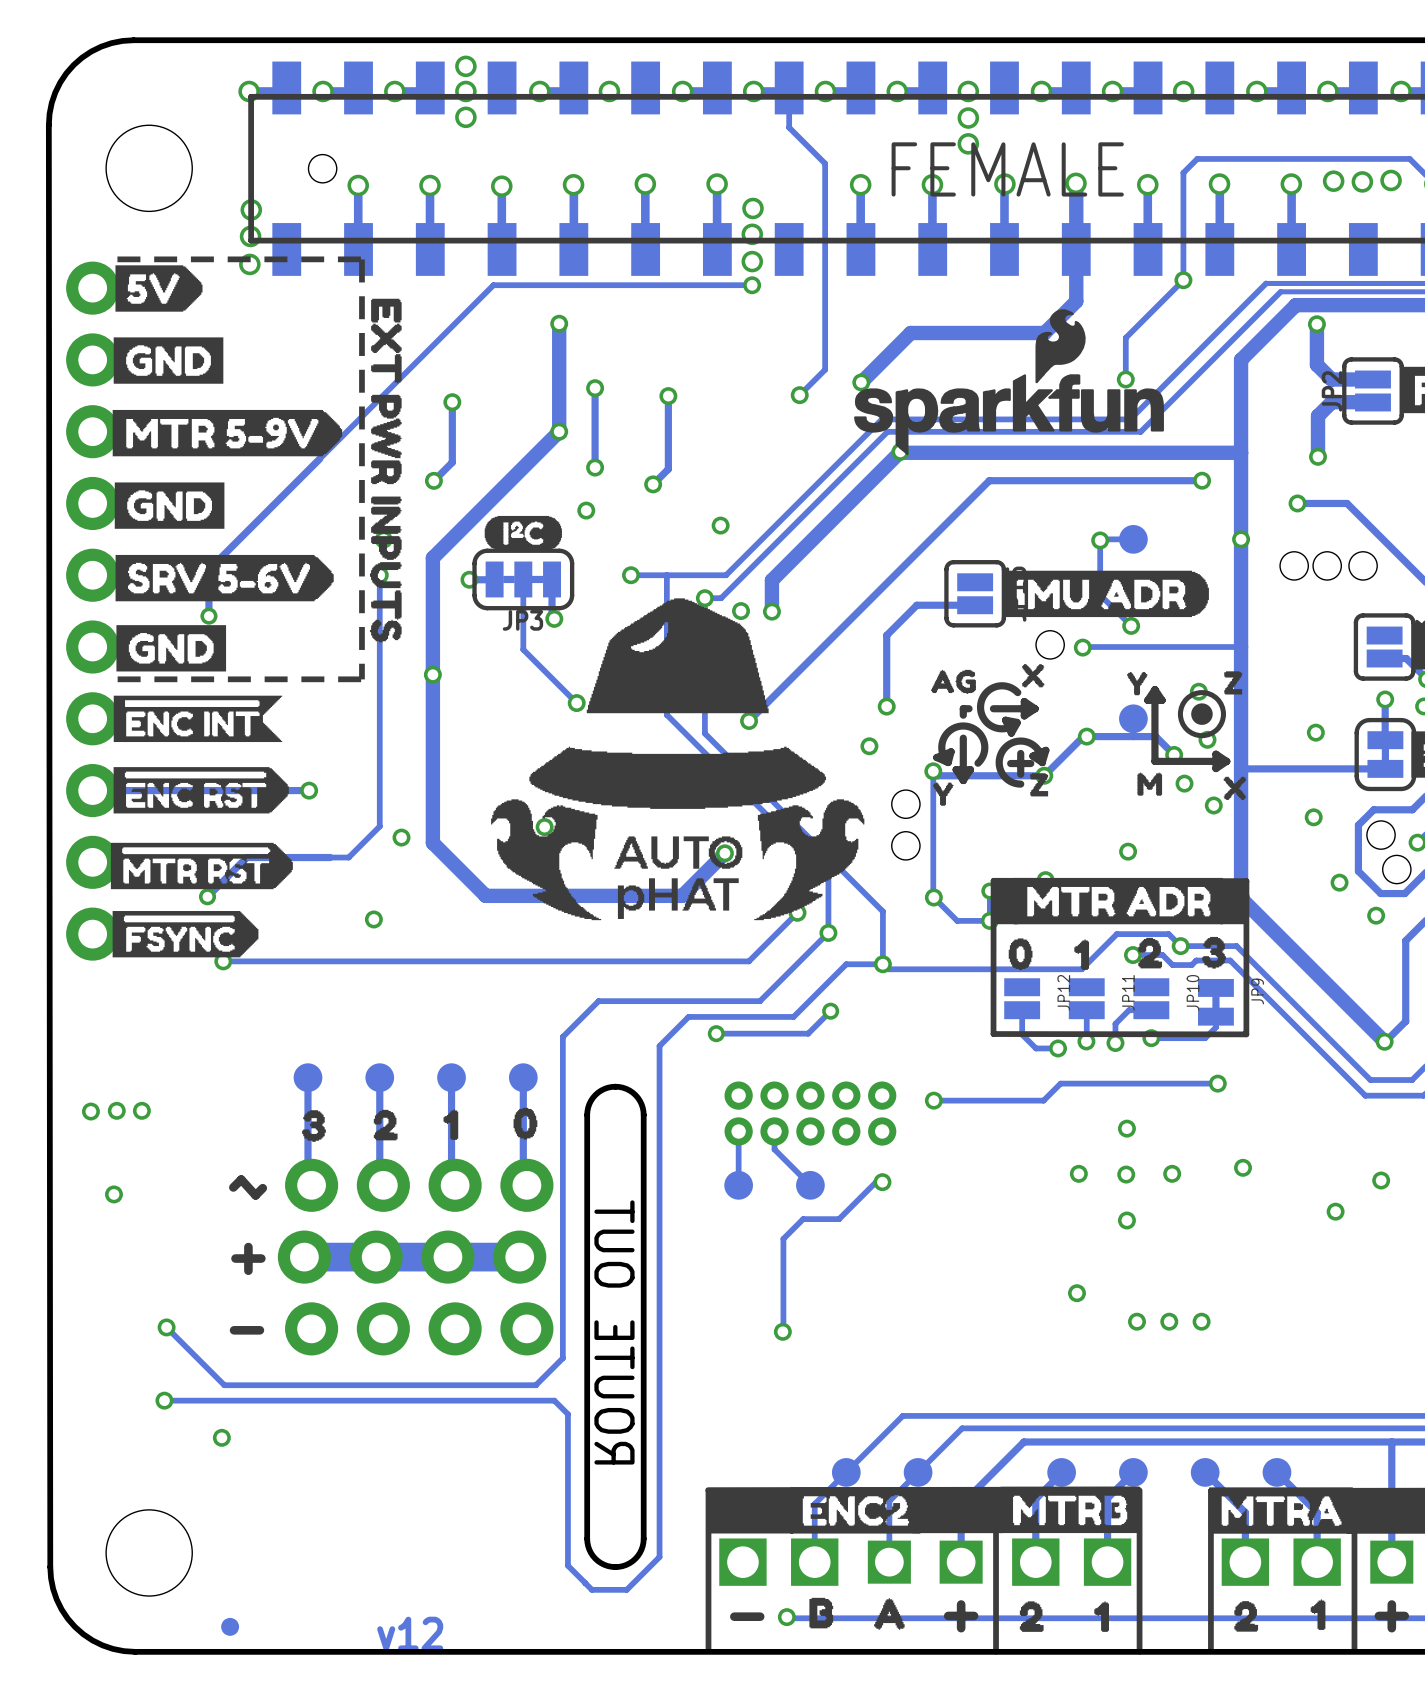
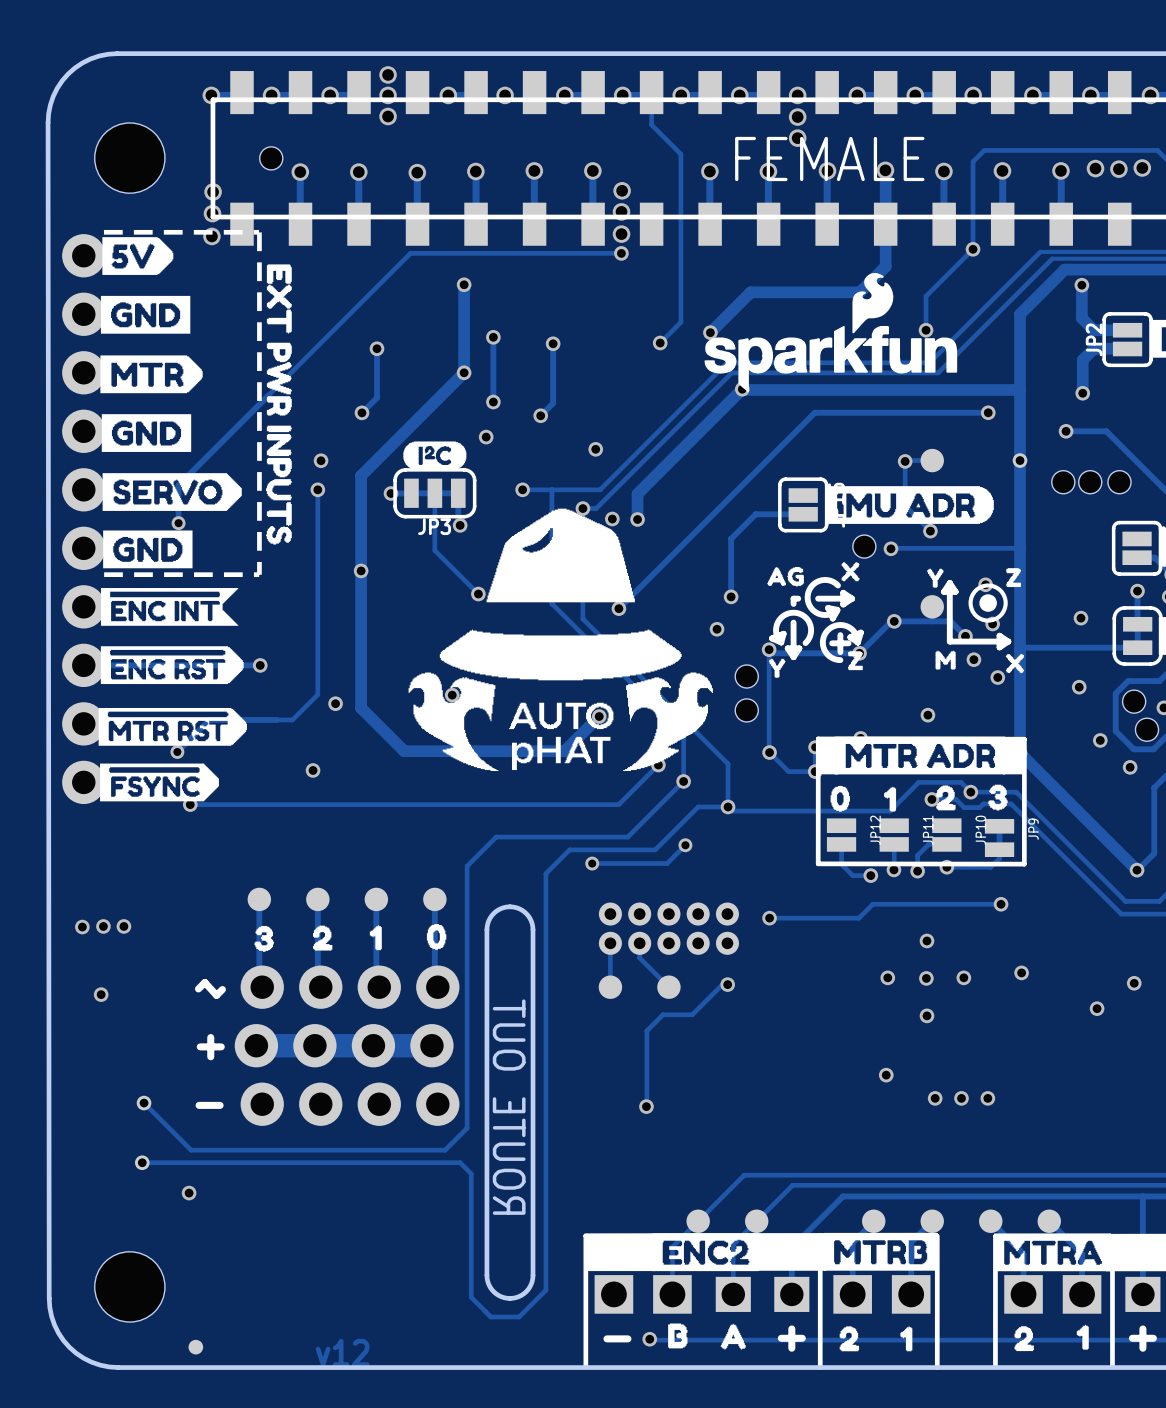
line: (361, 259) (307, 259) -> none
line: (361, 259) (361, 679) -> none
drawing: [112, 409, 343, 457] -> none
drawing: none -> [100, 355, 203, 394]
drawing position: (385, 470) -> (278, 404)
drawing shape: [115, 554, 334, 602] -> [102, 473, 242, 511]
line: (361, 679) (307, 679) -> (259, 232) (259, 574)

